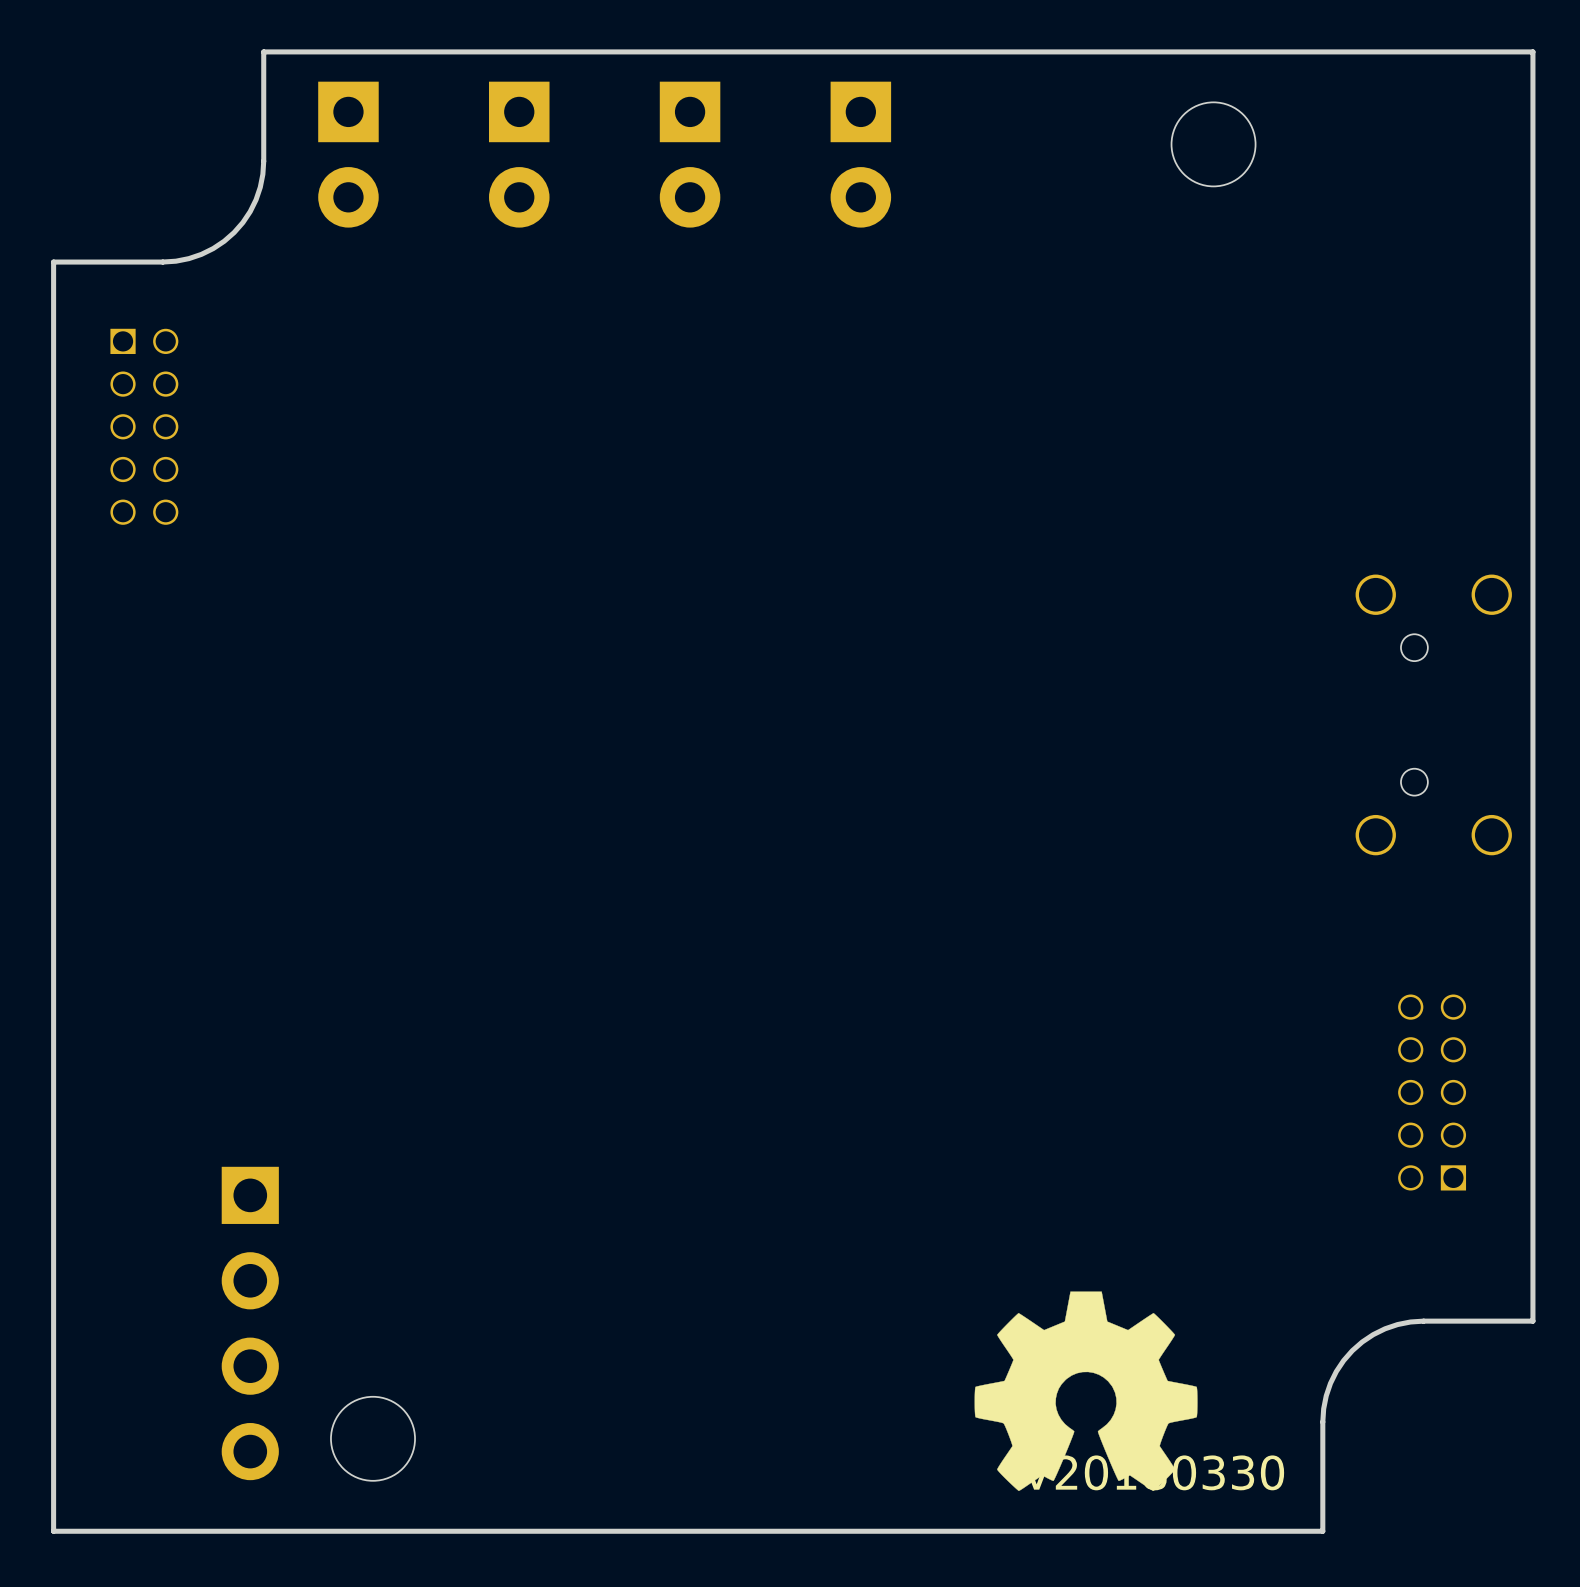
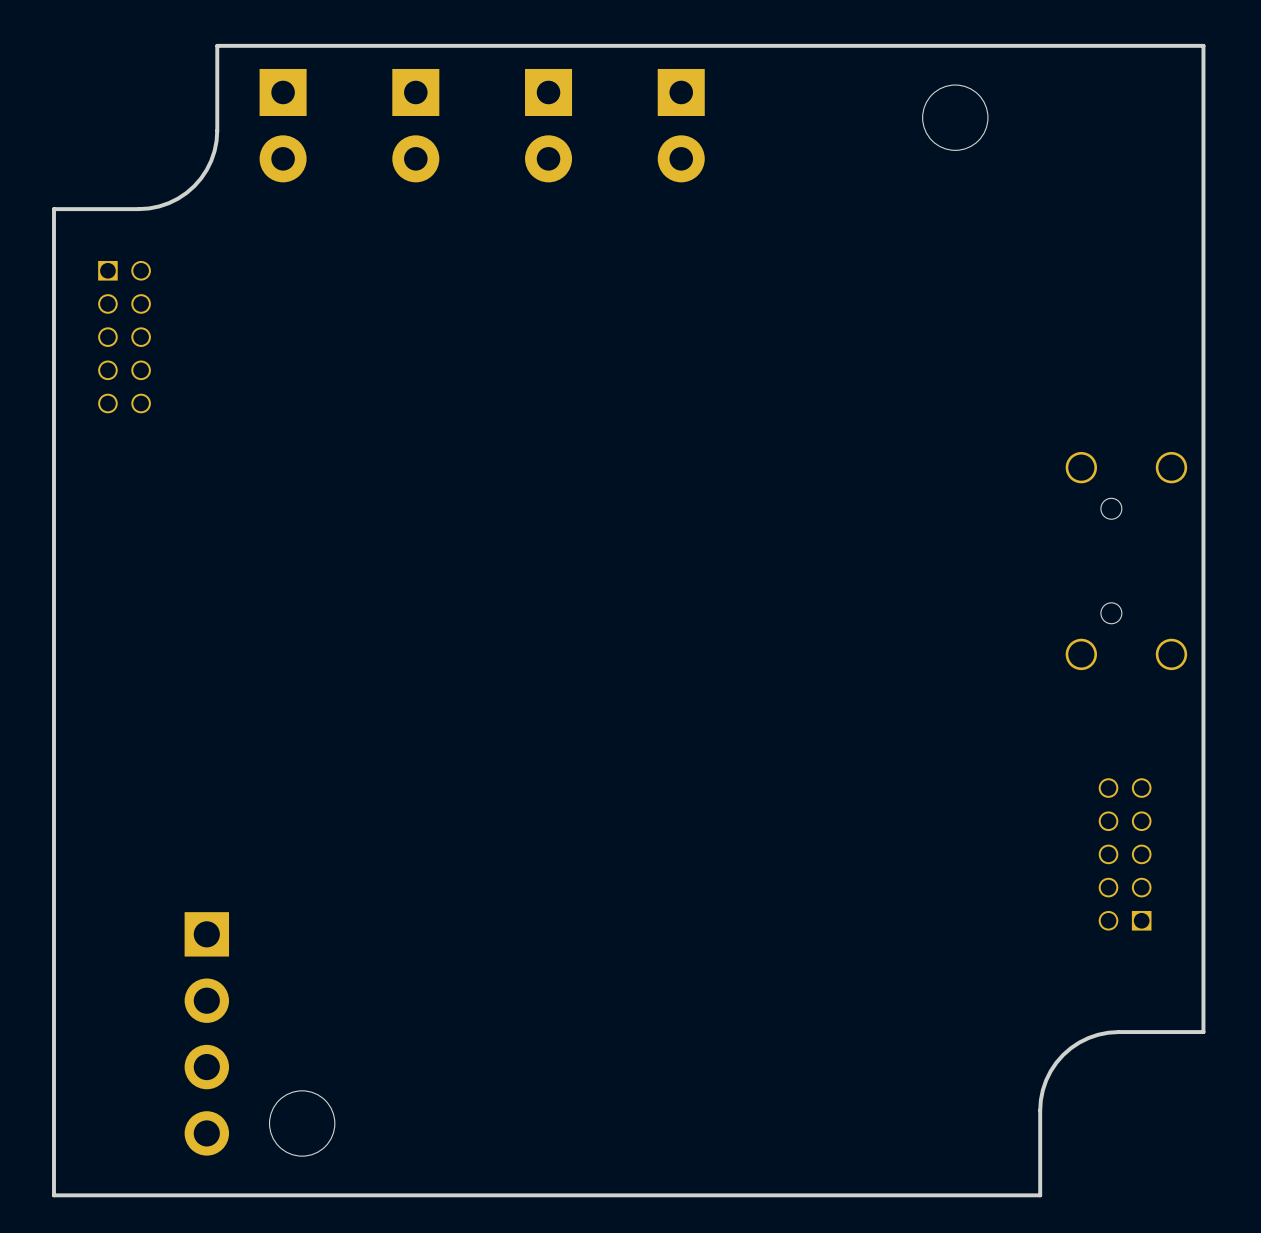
drawing: [974, 1291, 1198, 1492] -> none

